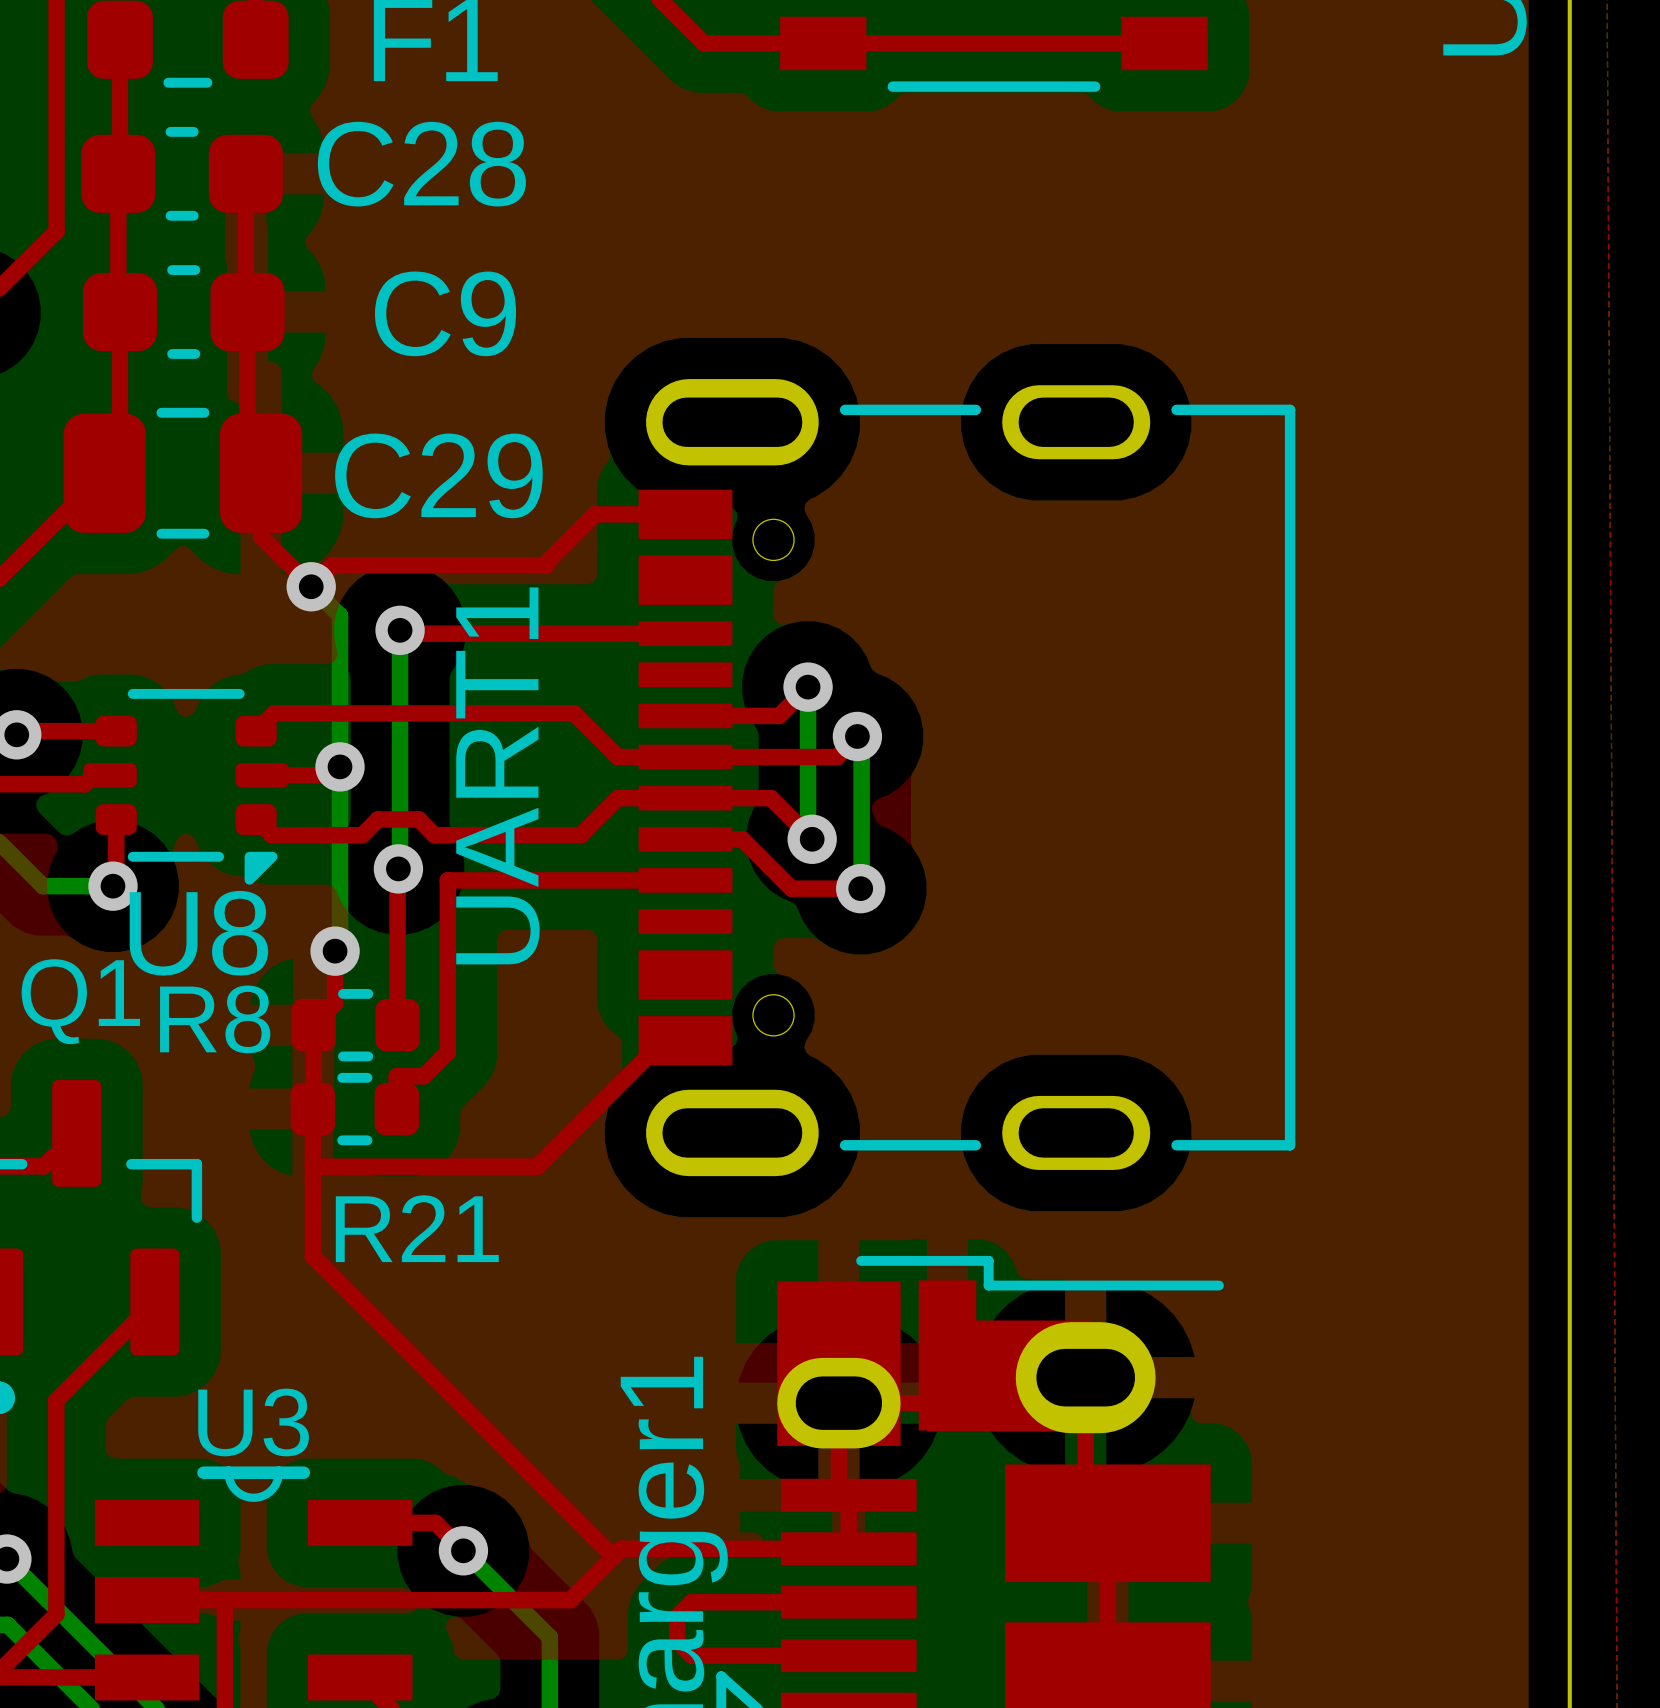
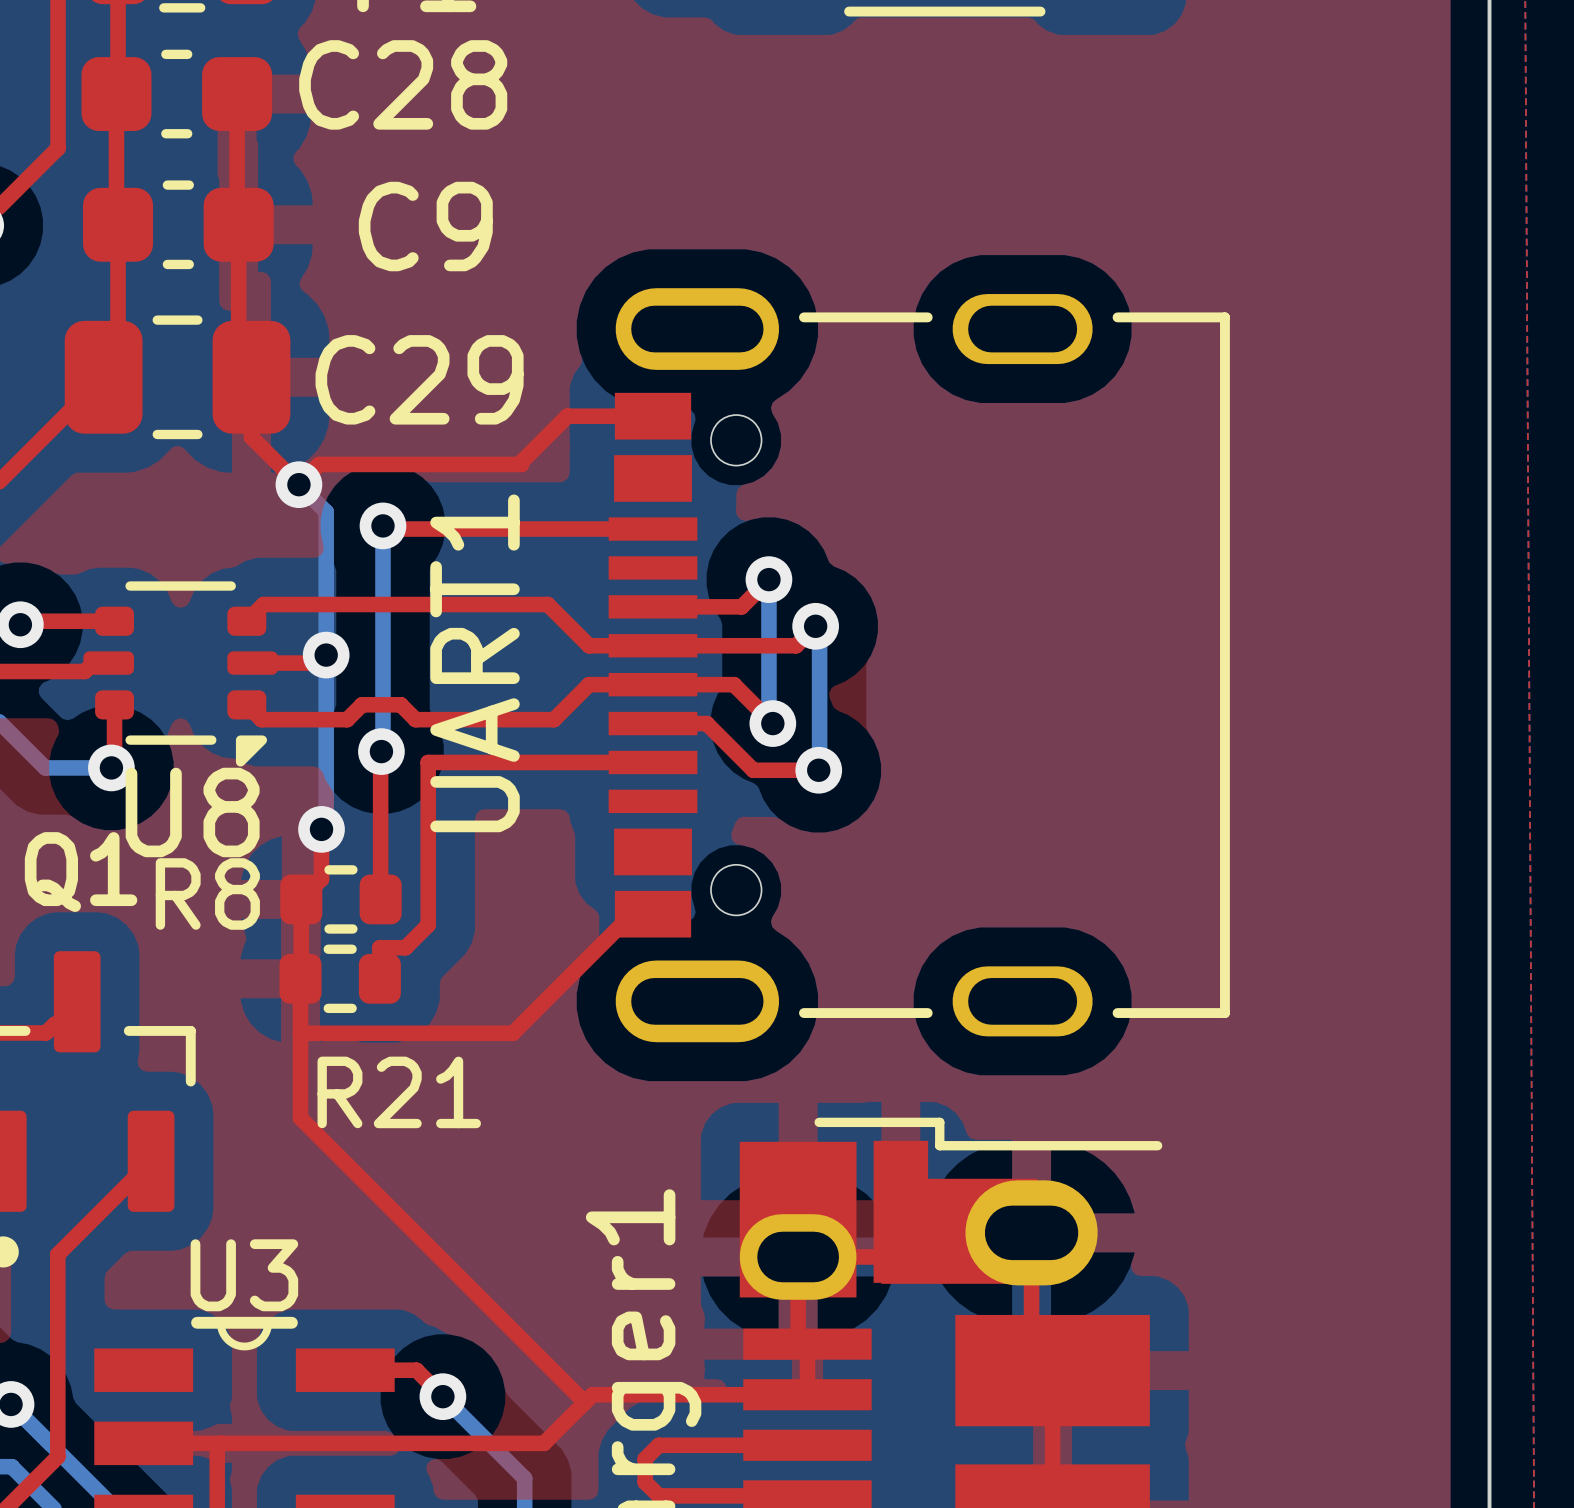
UART1 footprint: [638, 379, 1296, 1177] -> [608, 288, 1230, 1043]

